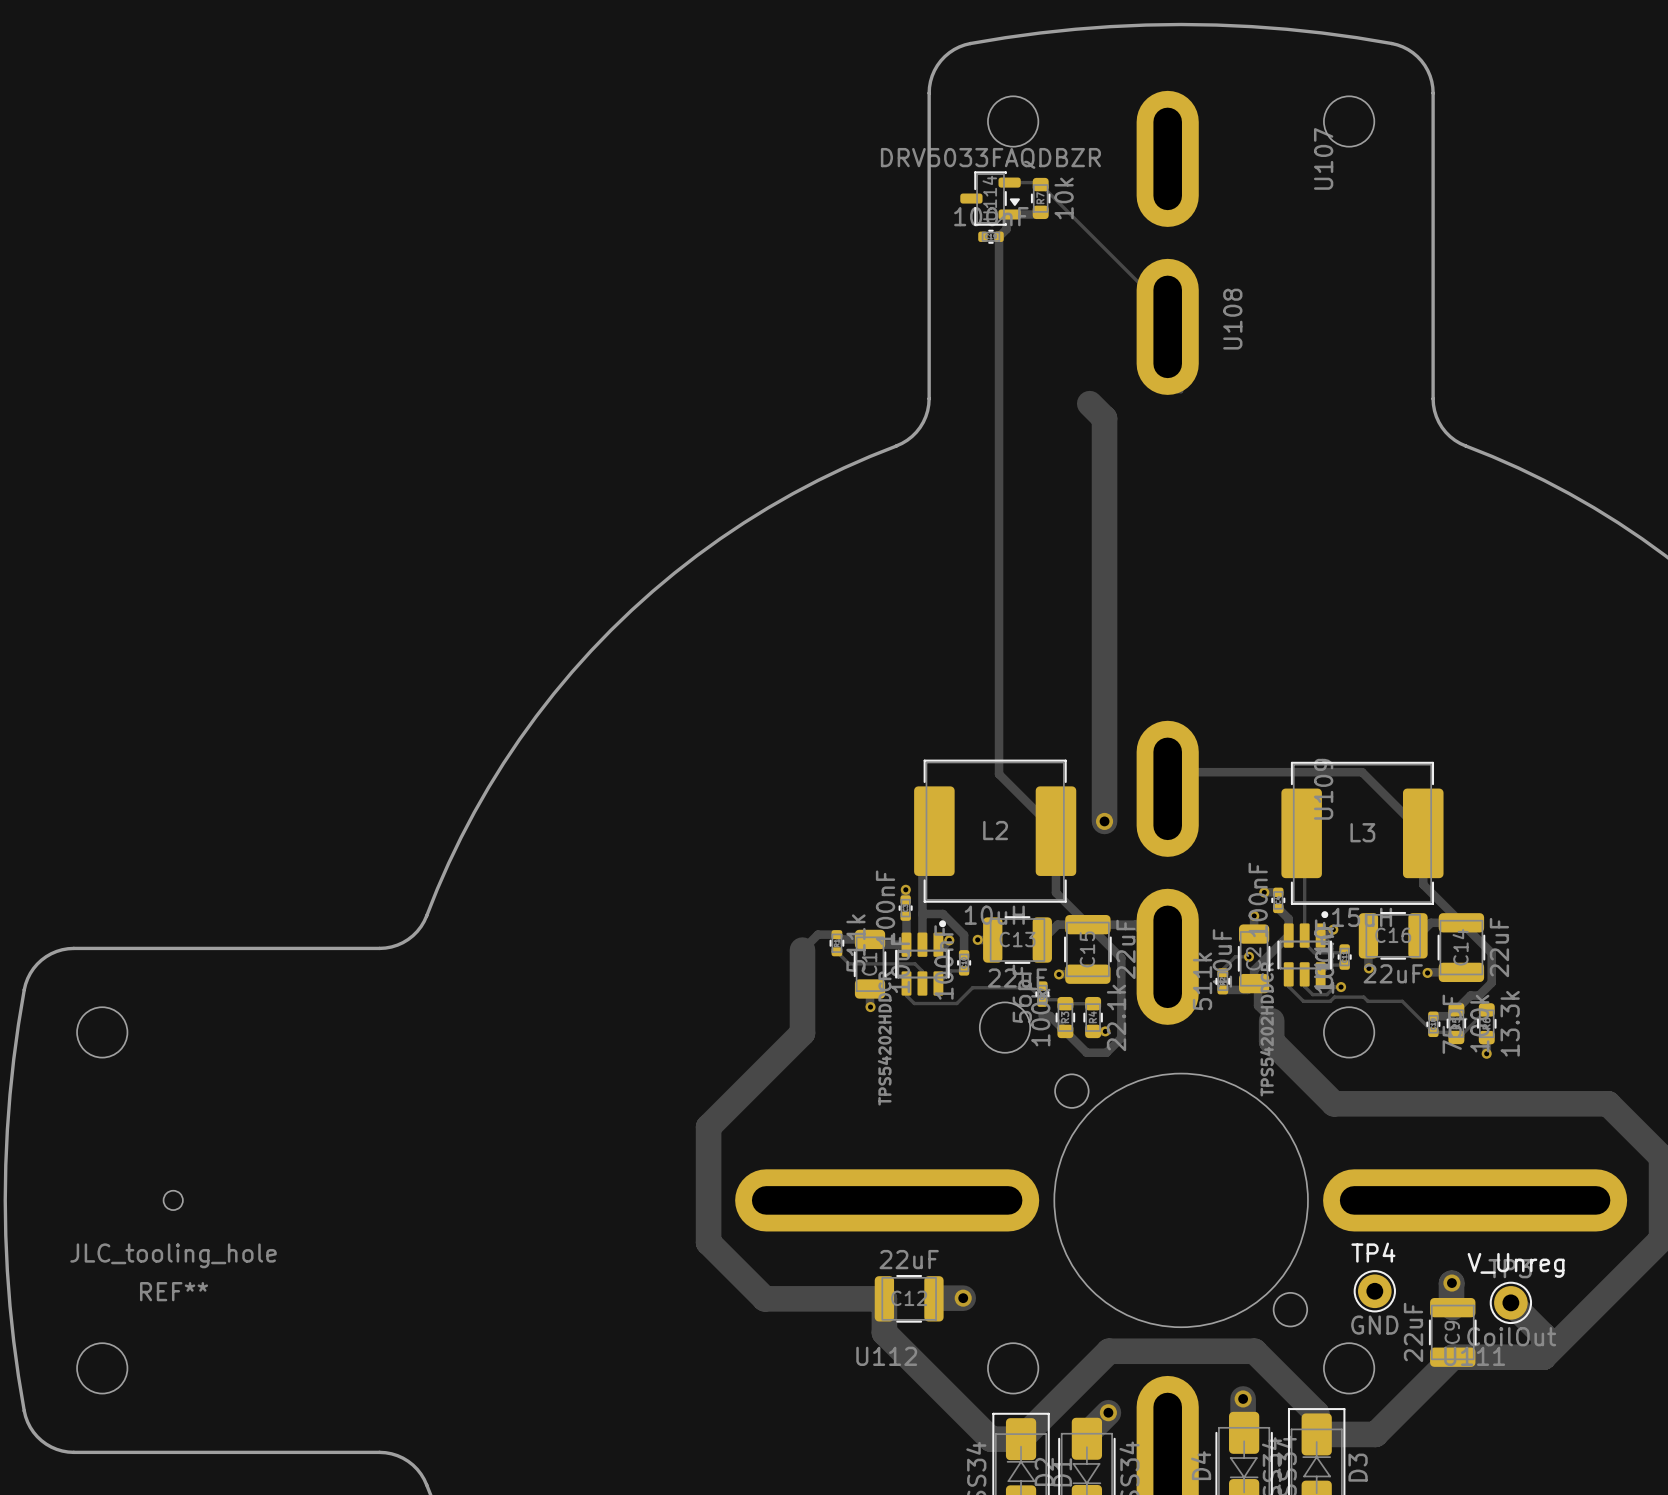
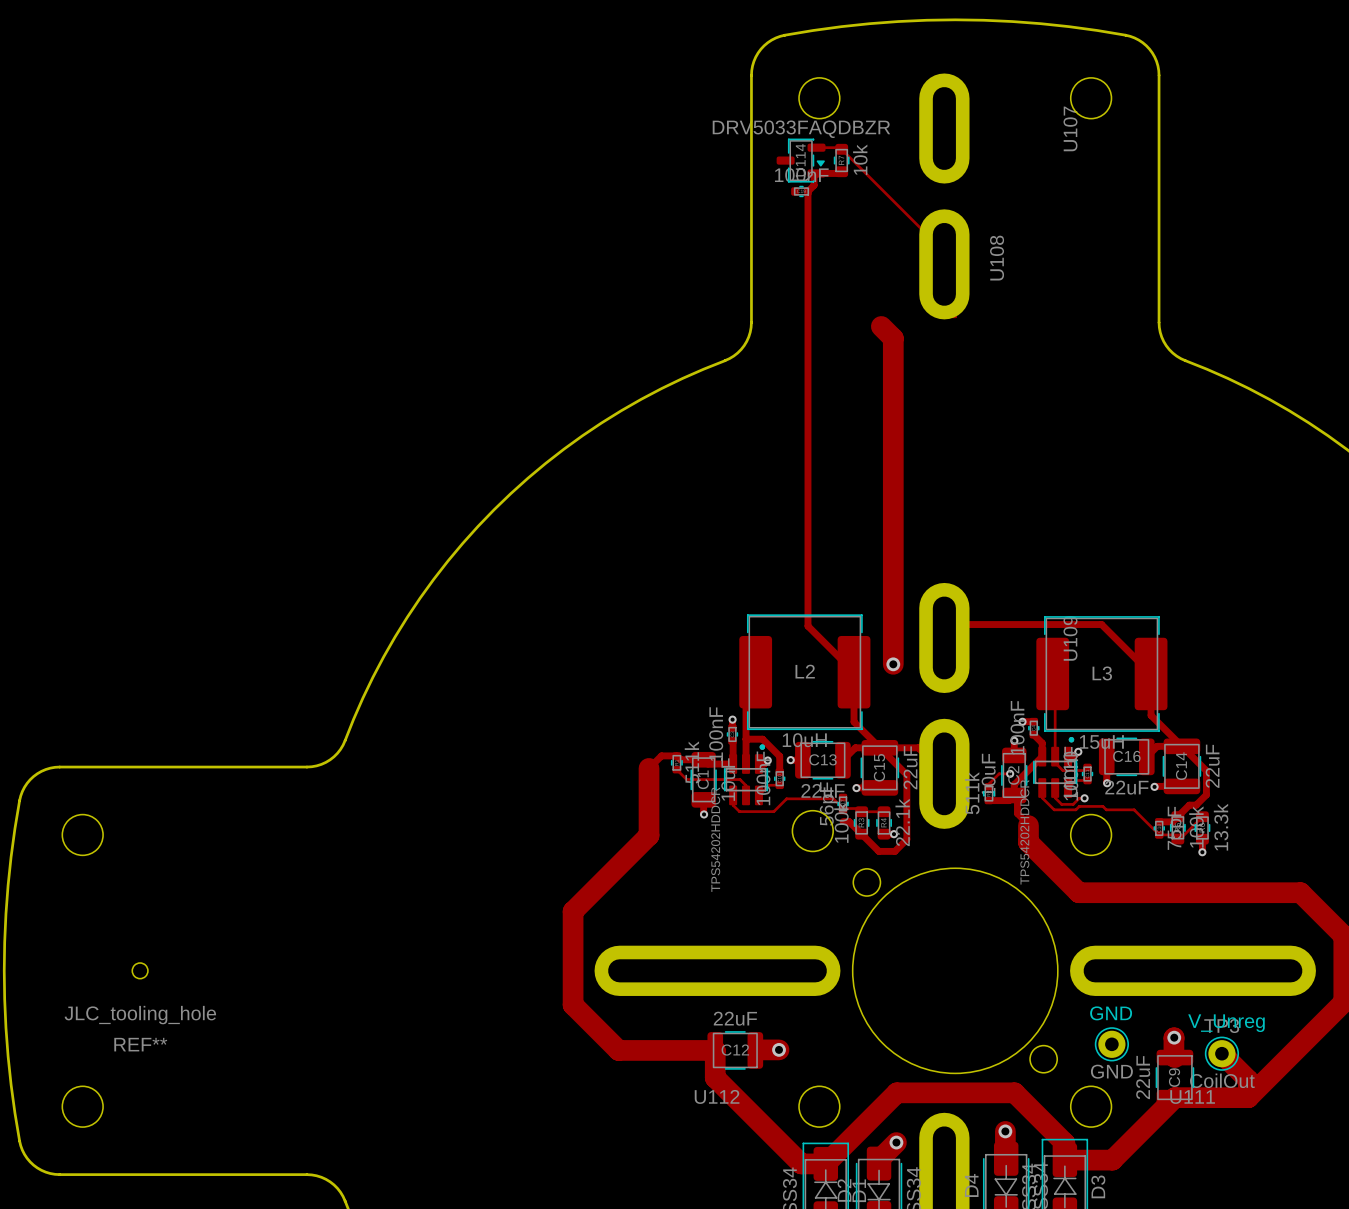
TP4 name: TP4 (1373, 1252) -> GND (1111, 1013)

